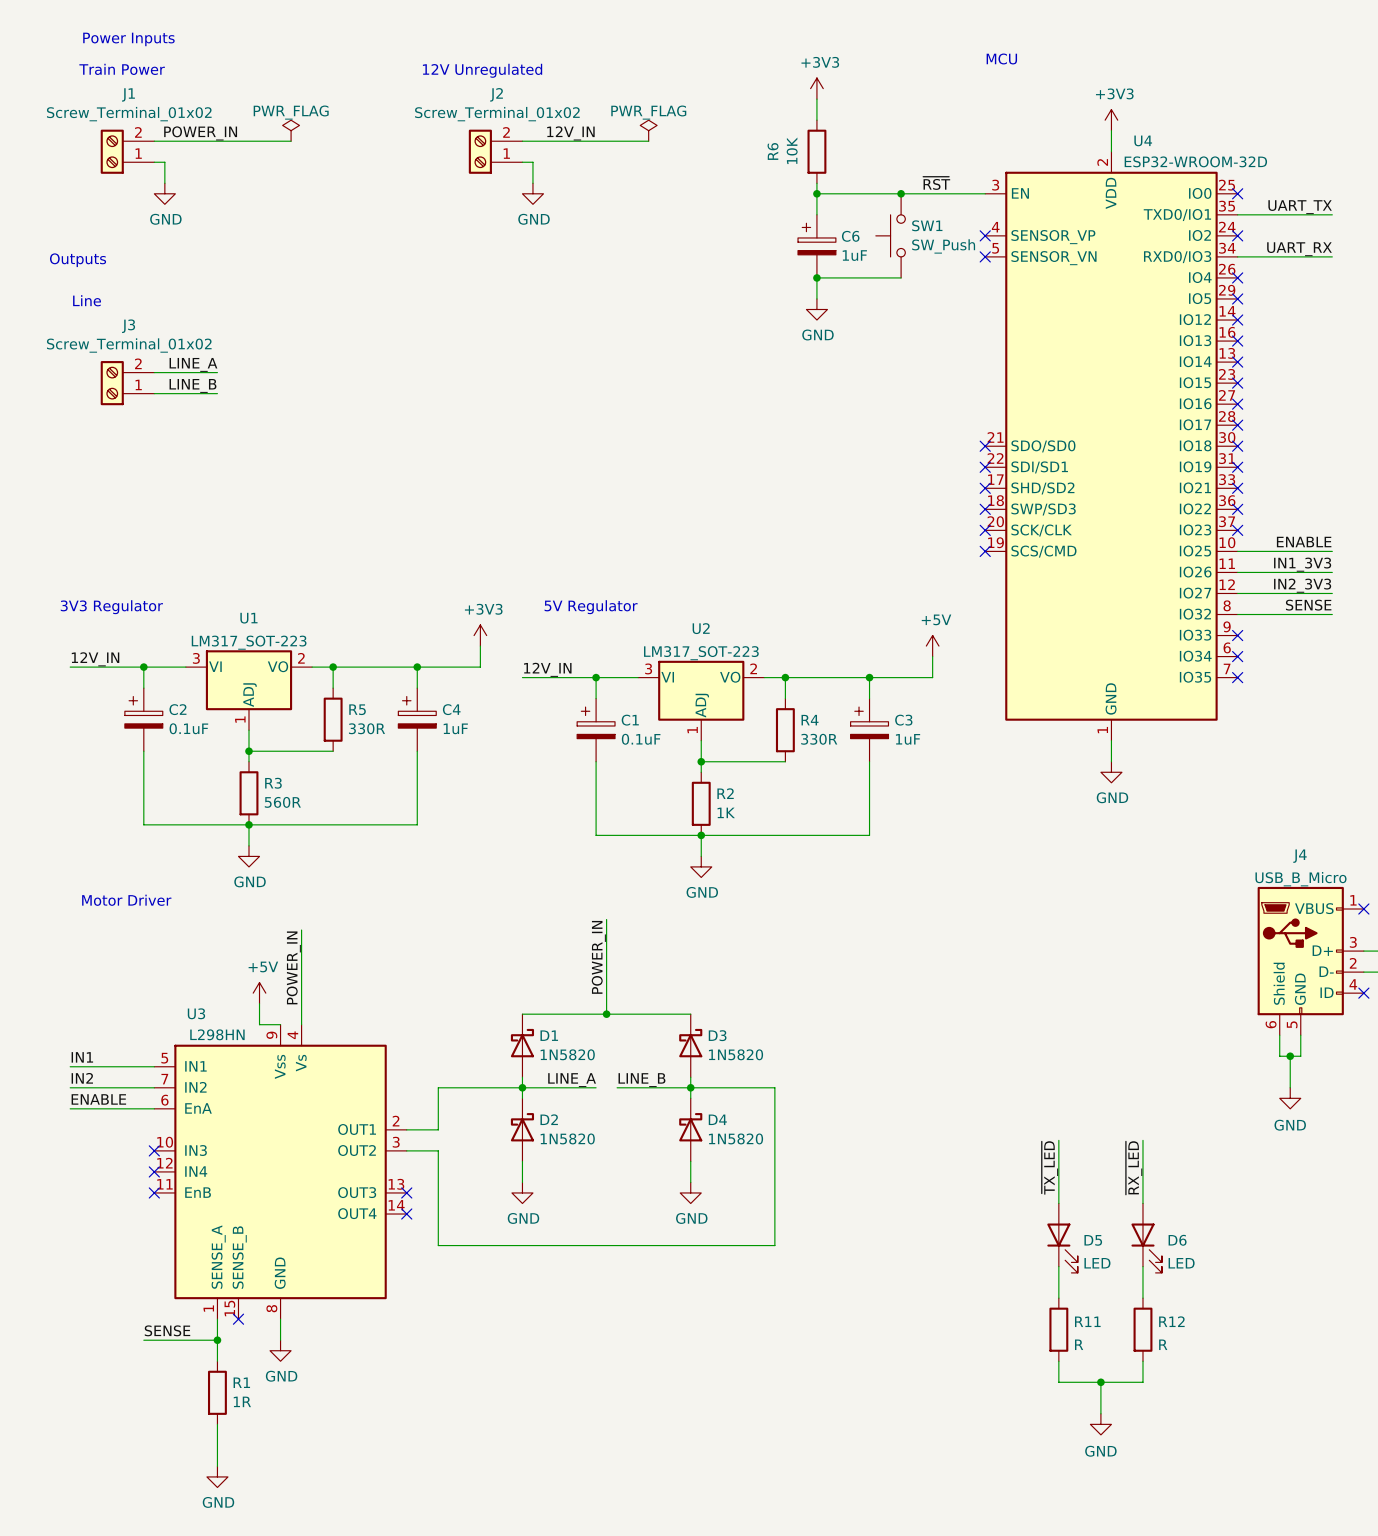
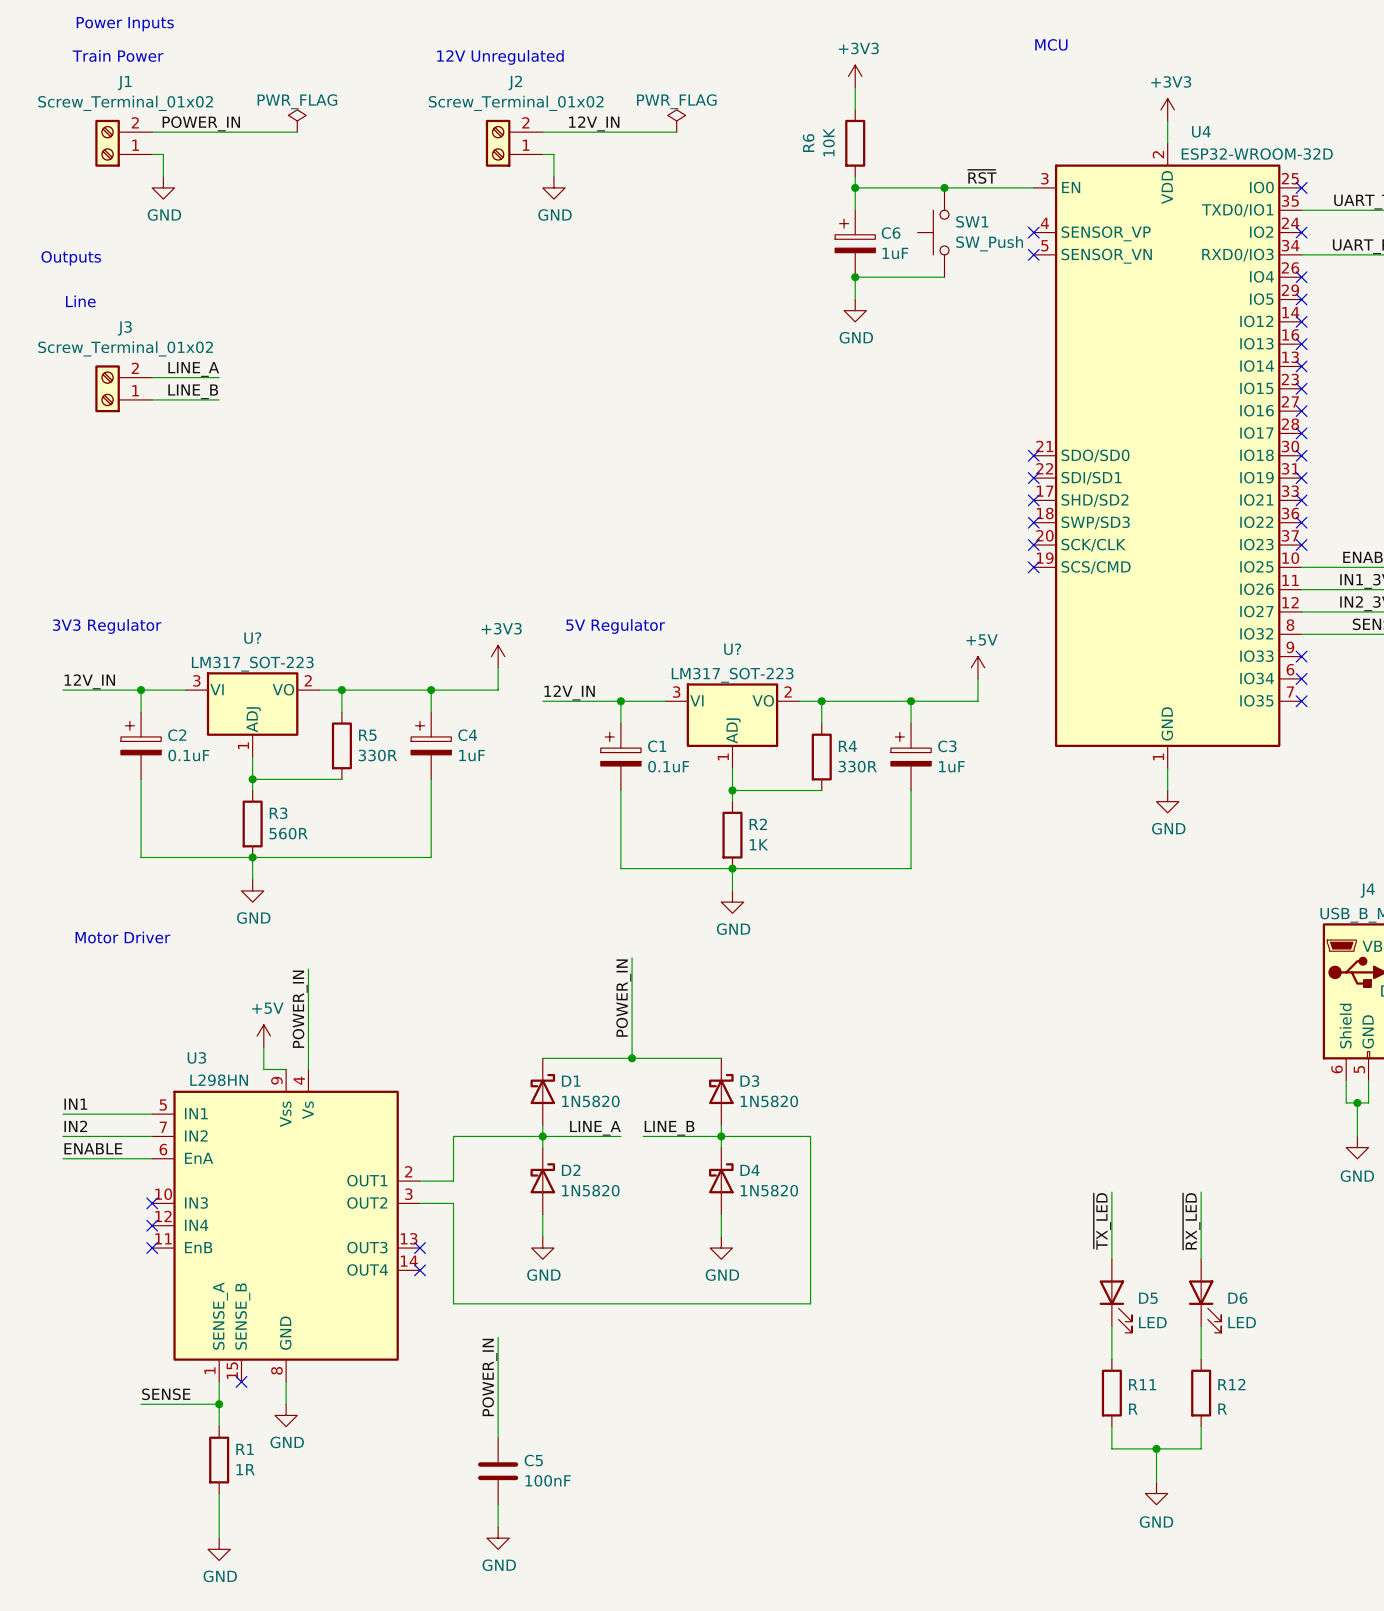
U1 name: U1 (248, 618) -> U? (252, 638)
U2 name: U2 (701, 628) -> U? (732, 649)
wire: none -> (498, 1337) (498, 1437)
label: none -> POWER_IN (489, 1377)
C5: none -> 100nF (498, 1471)
wire: none -> (498, 1504) (498, 1527)
power symbol: none -> GND (498, 1538)

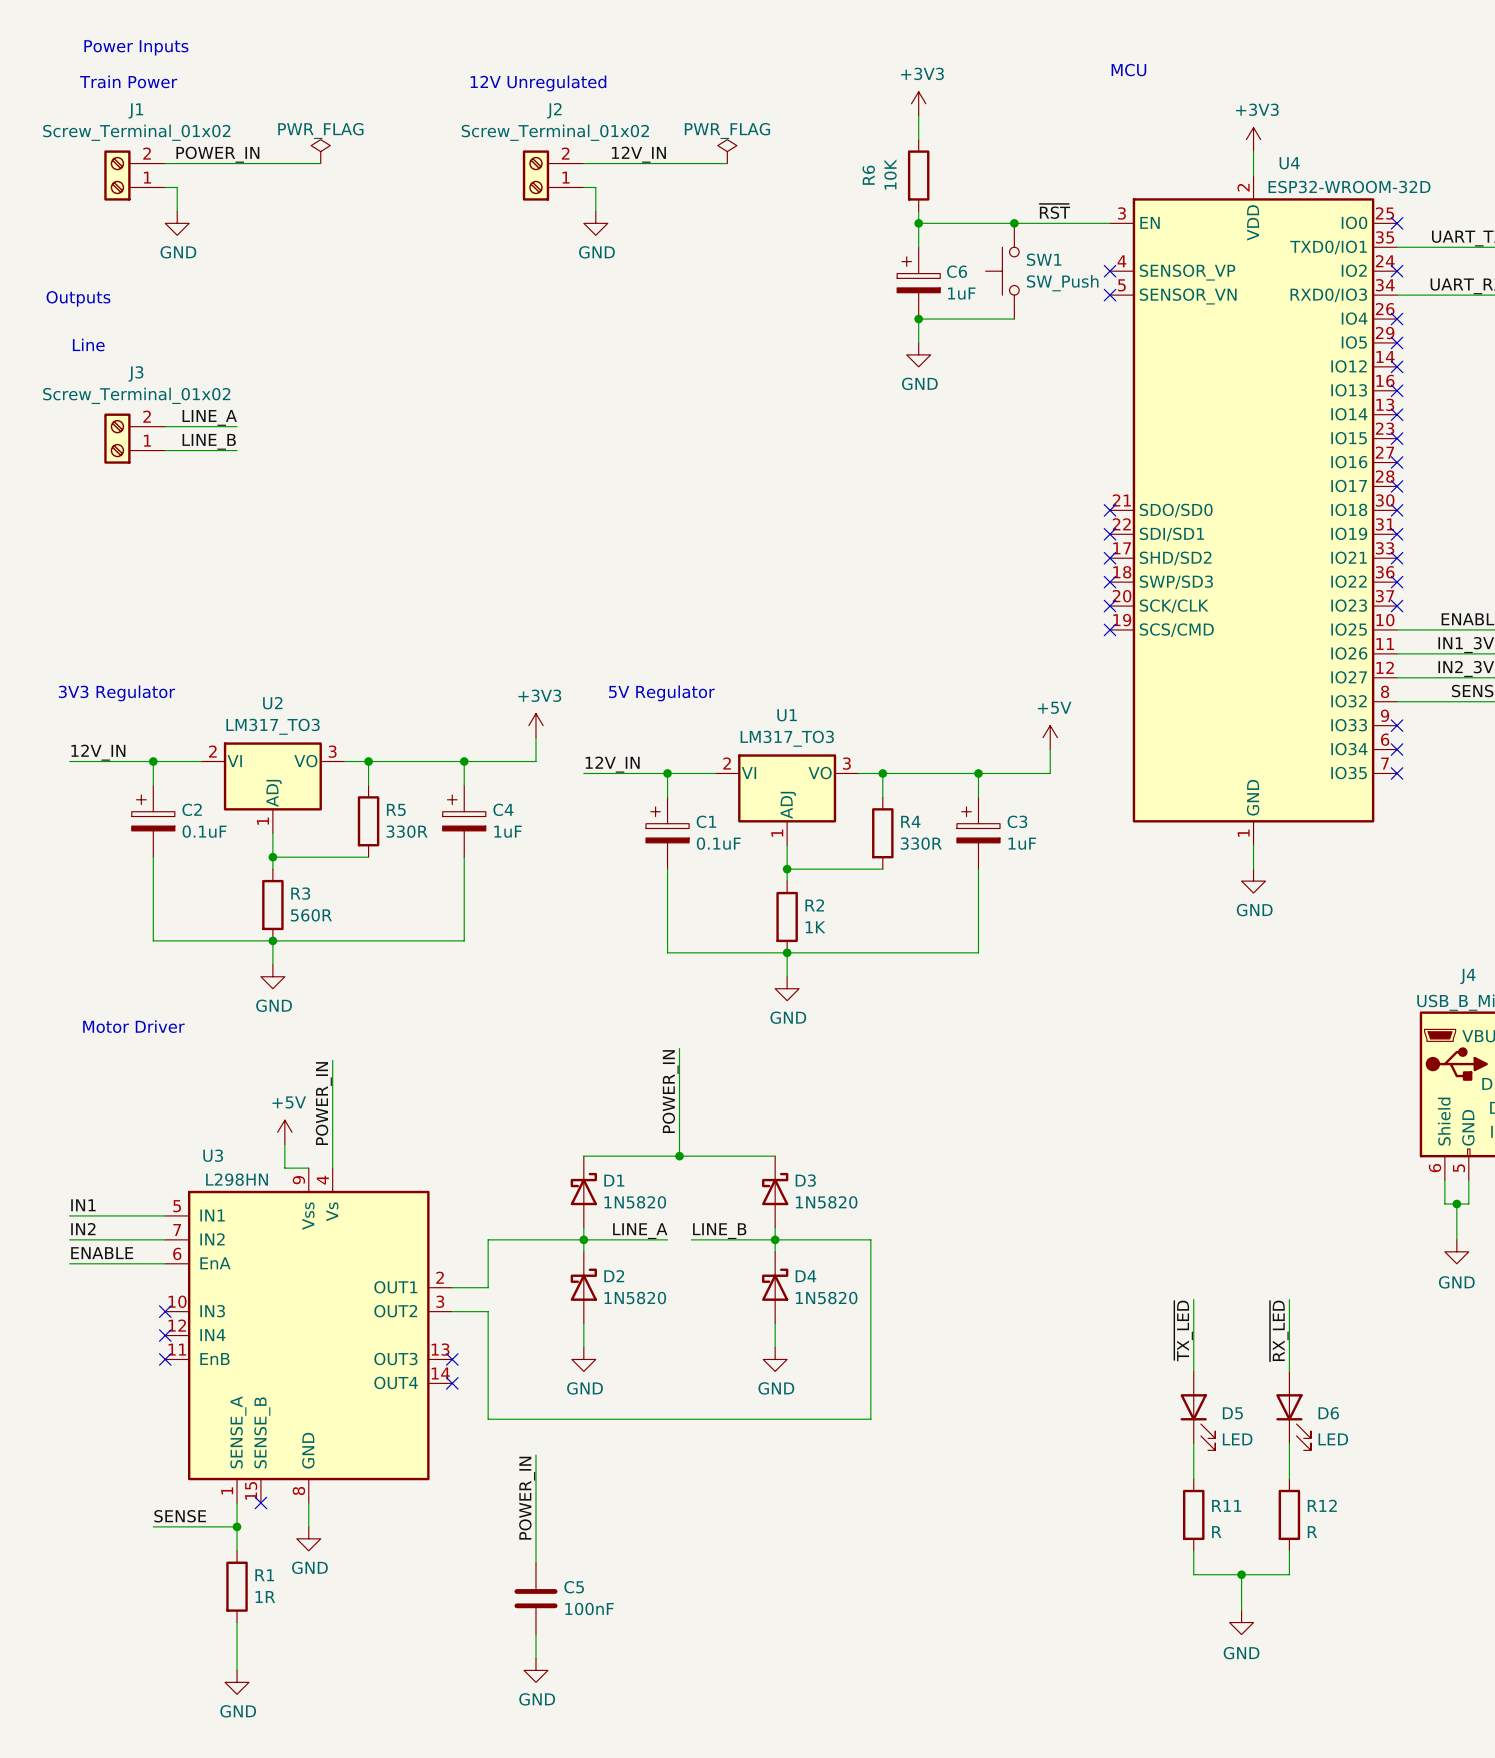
U? name: U? (252, 638) -> U2 (272, 703)
U? name: U? (732, 649) -> U1 (787, 715)
U? value: LM317_SOT-223 (252, 664) -> LM317_TO3 (273, 726)
U? value: LM317_SOT-223 (732, 675) -> LM317_TO3 (787, 738)
U? pin number: 3 (196, 680) -> 2 (212, 751)
U? pin number: 2 (308, 680) -> 3 (332, 751)
U? pin number: 2 (788, 691) -> 3 (846, 763)
U? pin number: 3 (676, 692) -> 2 (727, 763)

